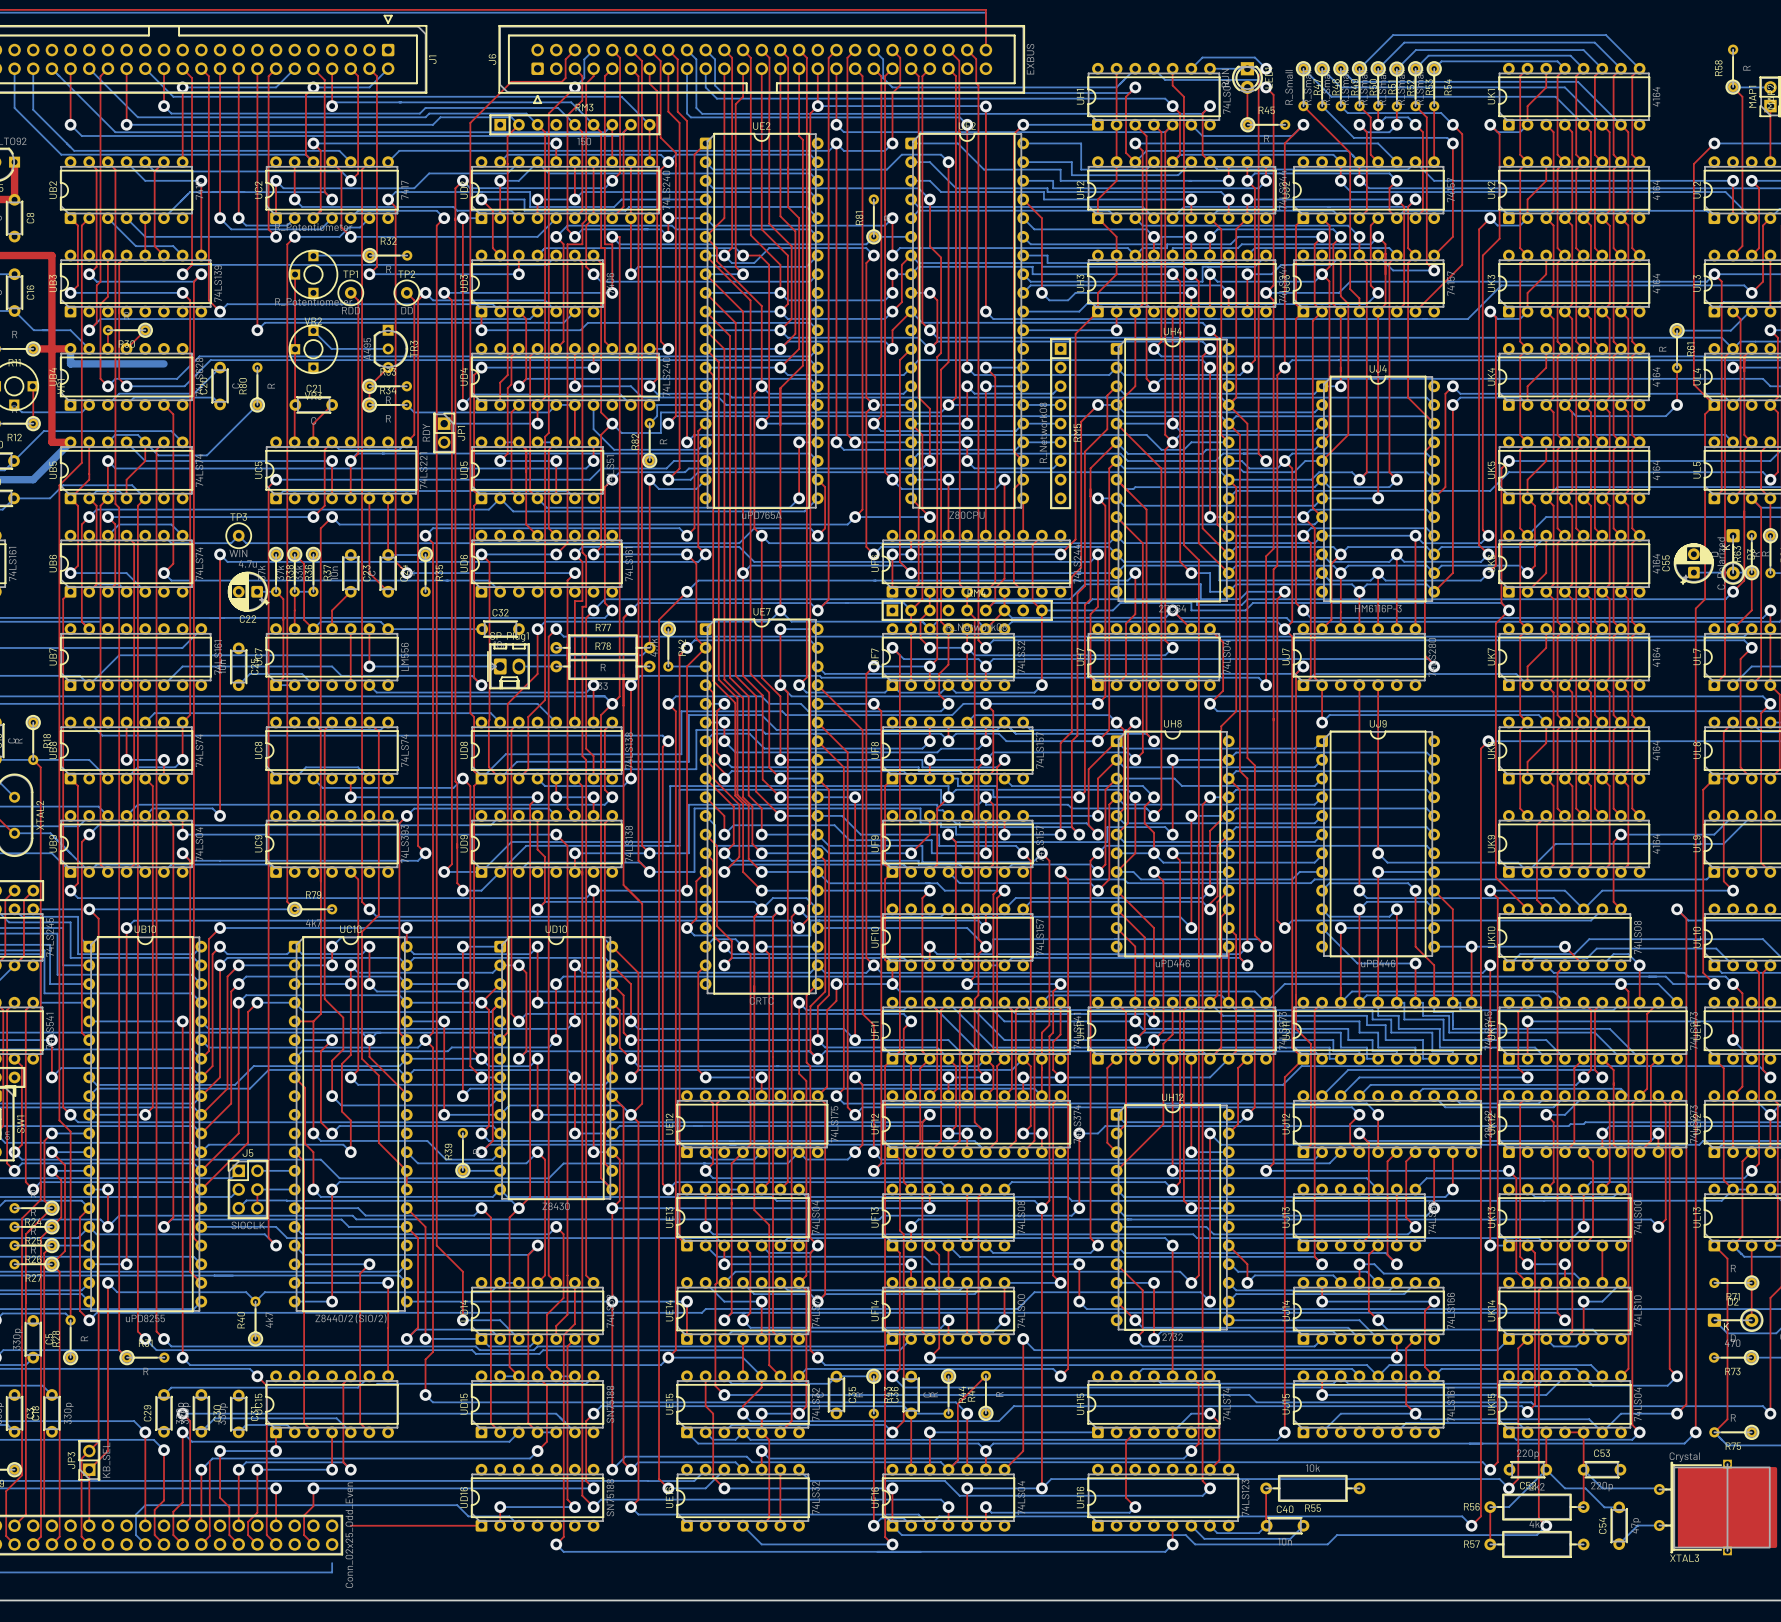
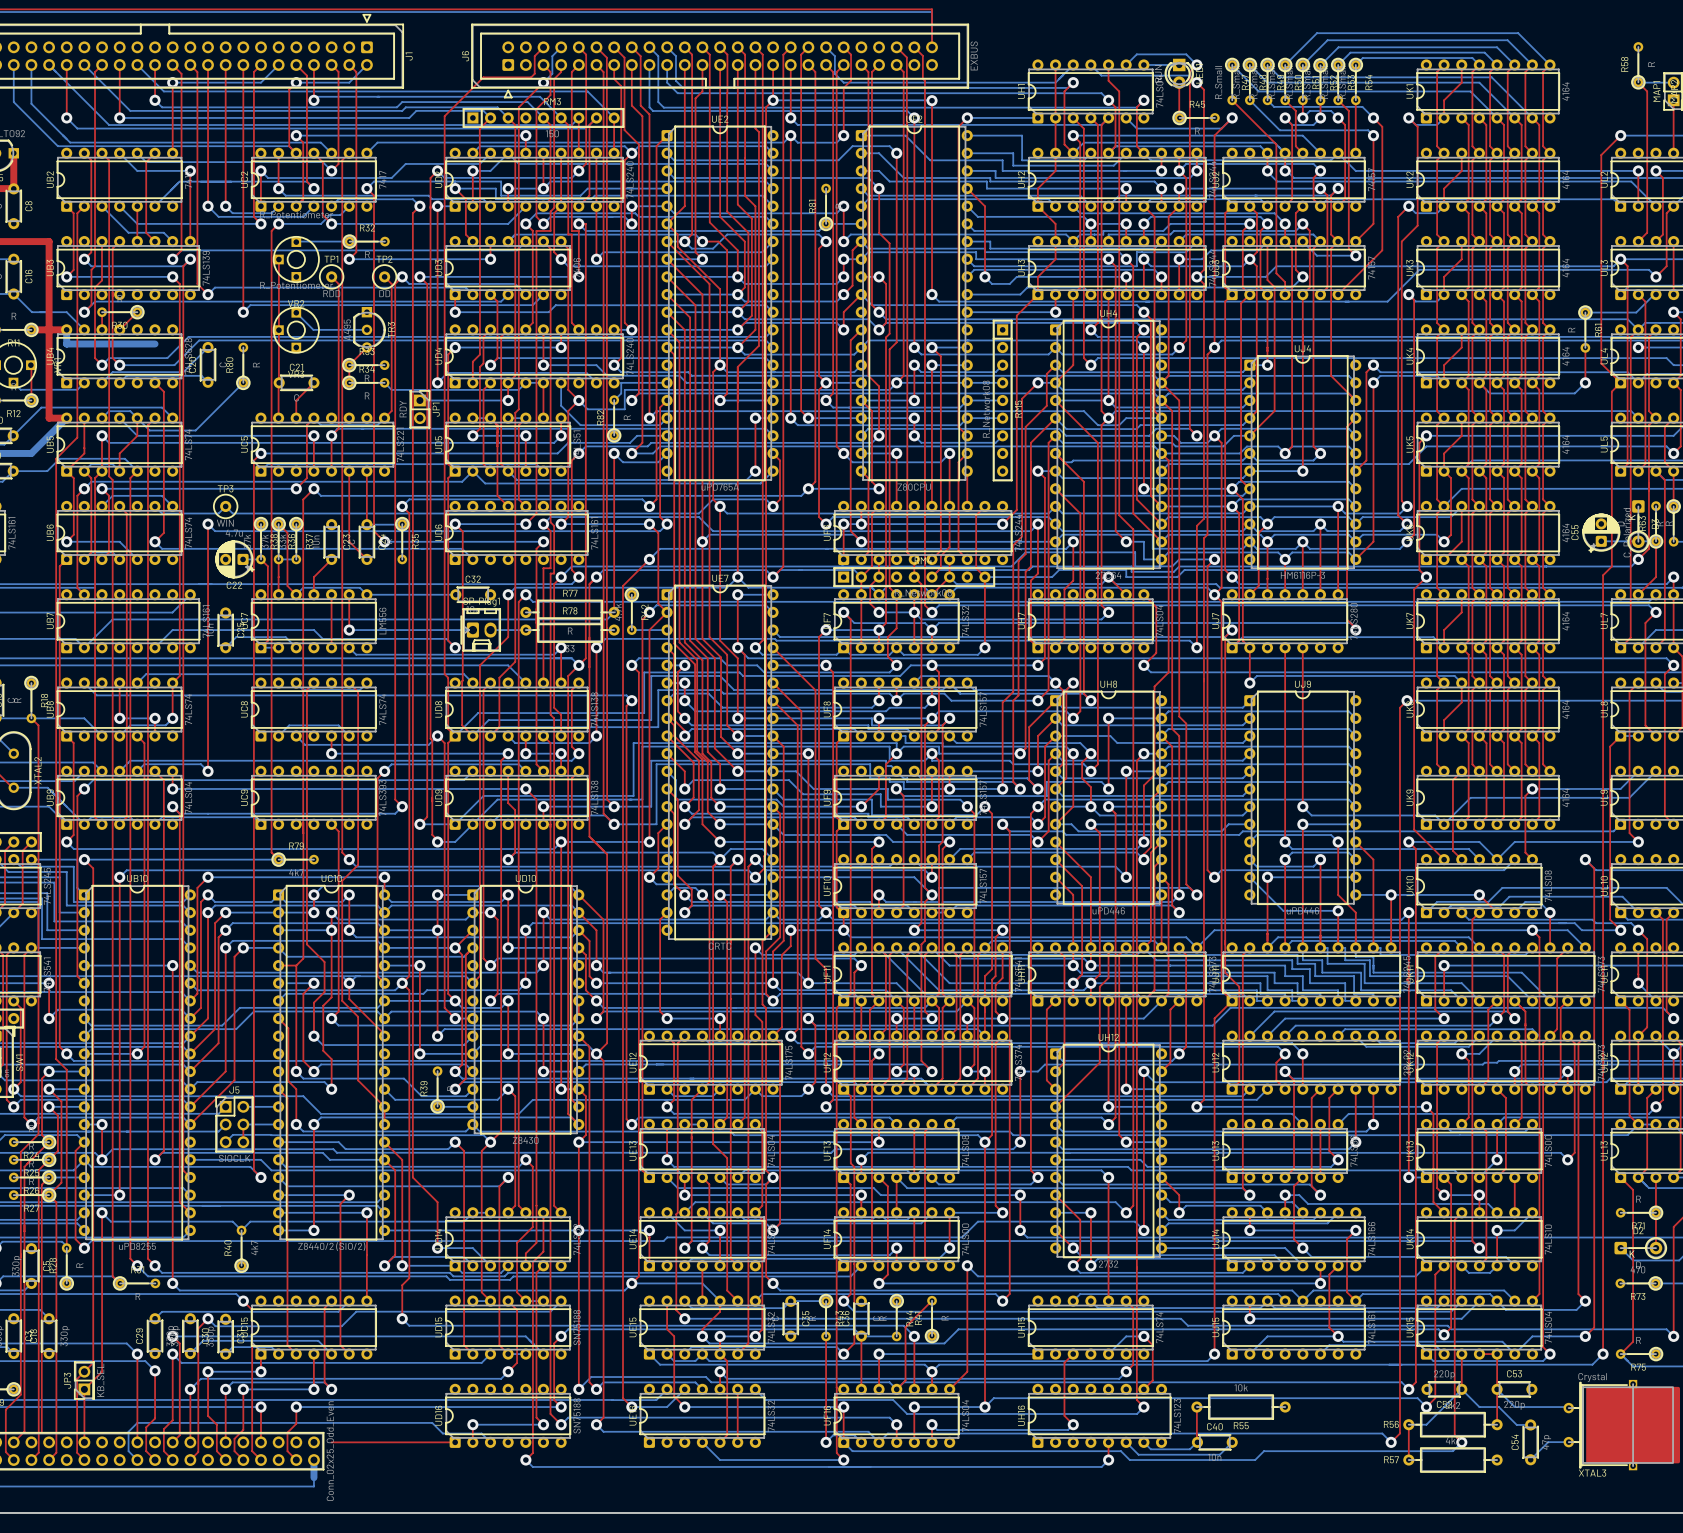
bottom track: (376, 1383) (586, 1383) -> (208, 1318) (215, 1326) (341, 1326) (356, 1311) (550, 1311) (554, 1308)
top track: none -> (208, 1318) (198, 1328) (198, 1381)
via: none -> (208, 1318)
bottom track: none -> (313, 1460) (313, 1477)

